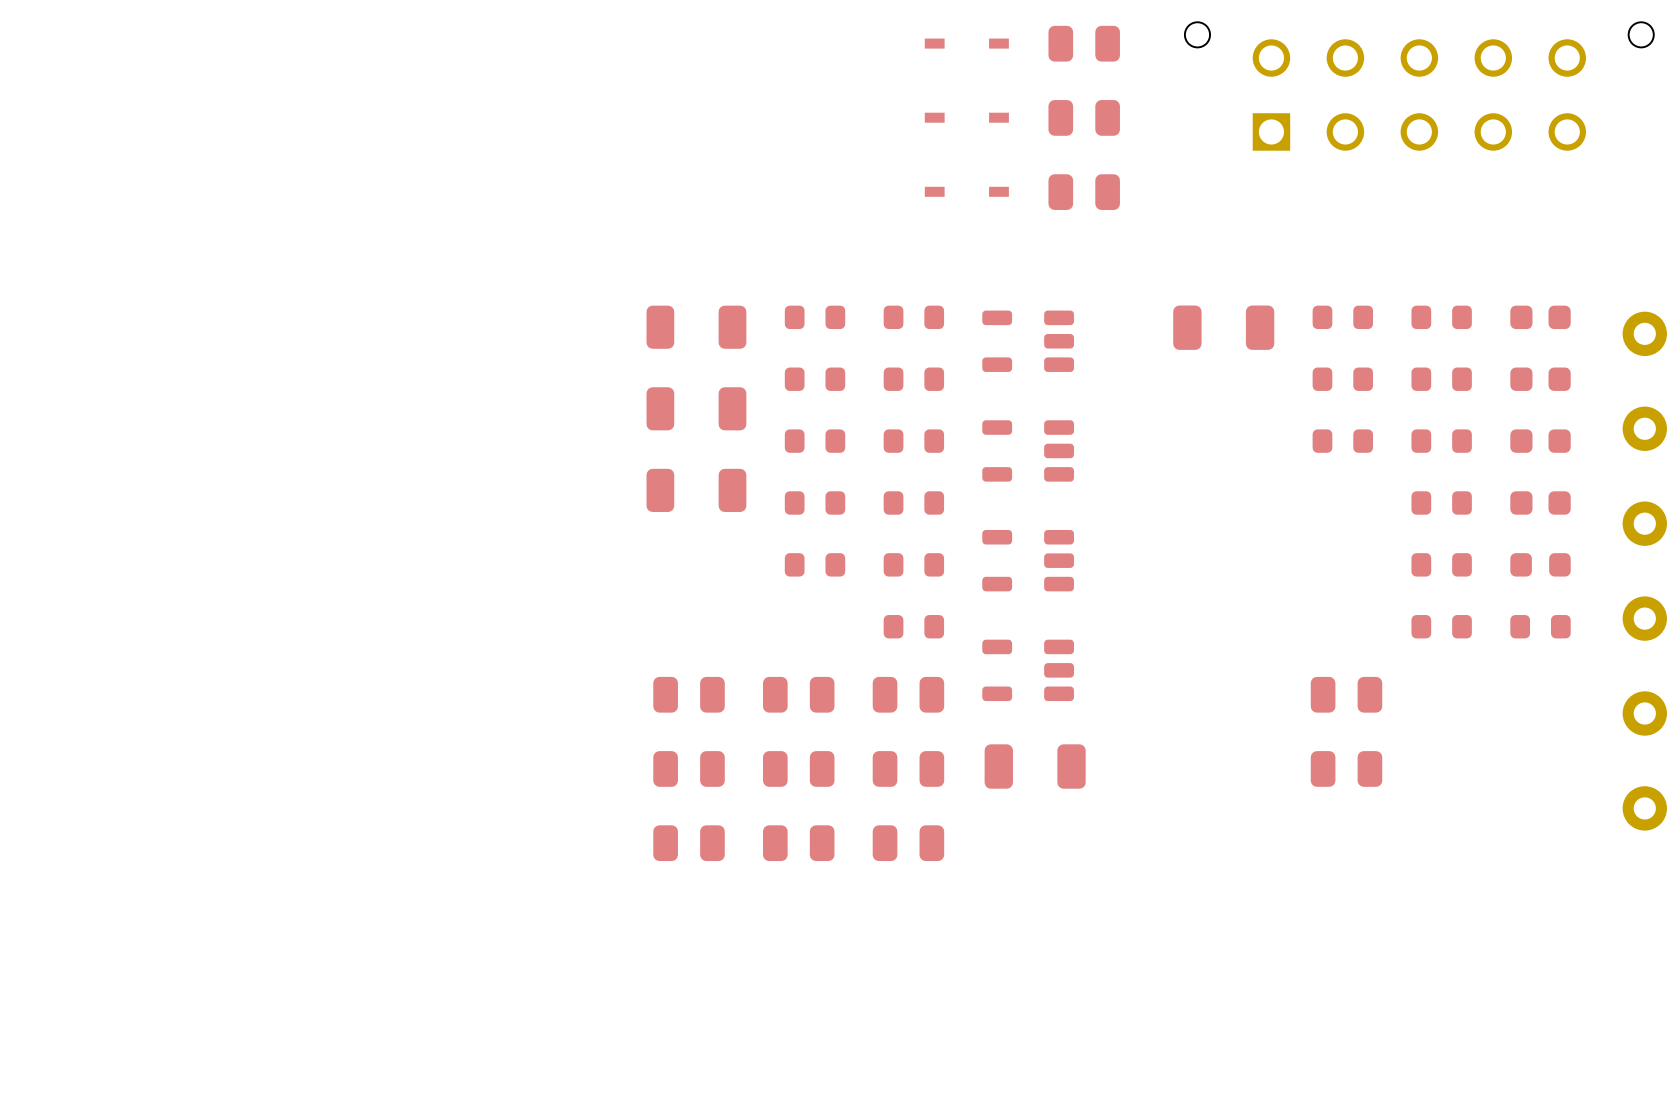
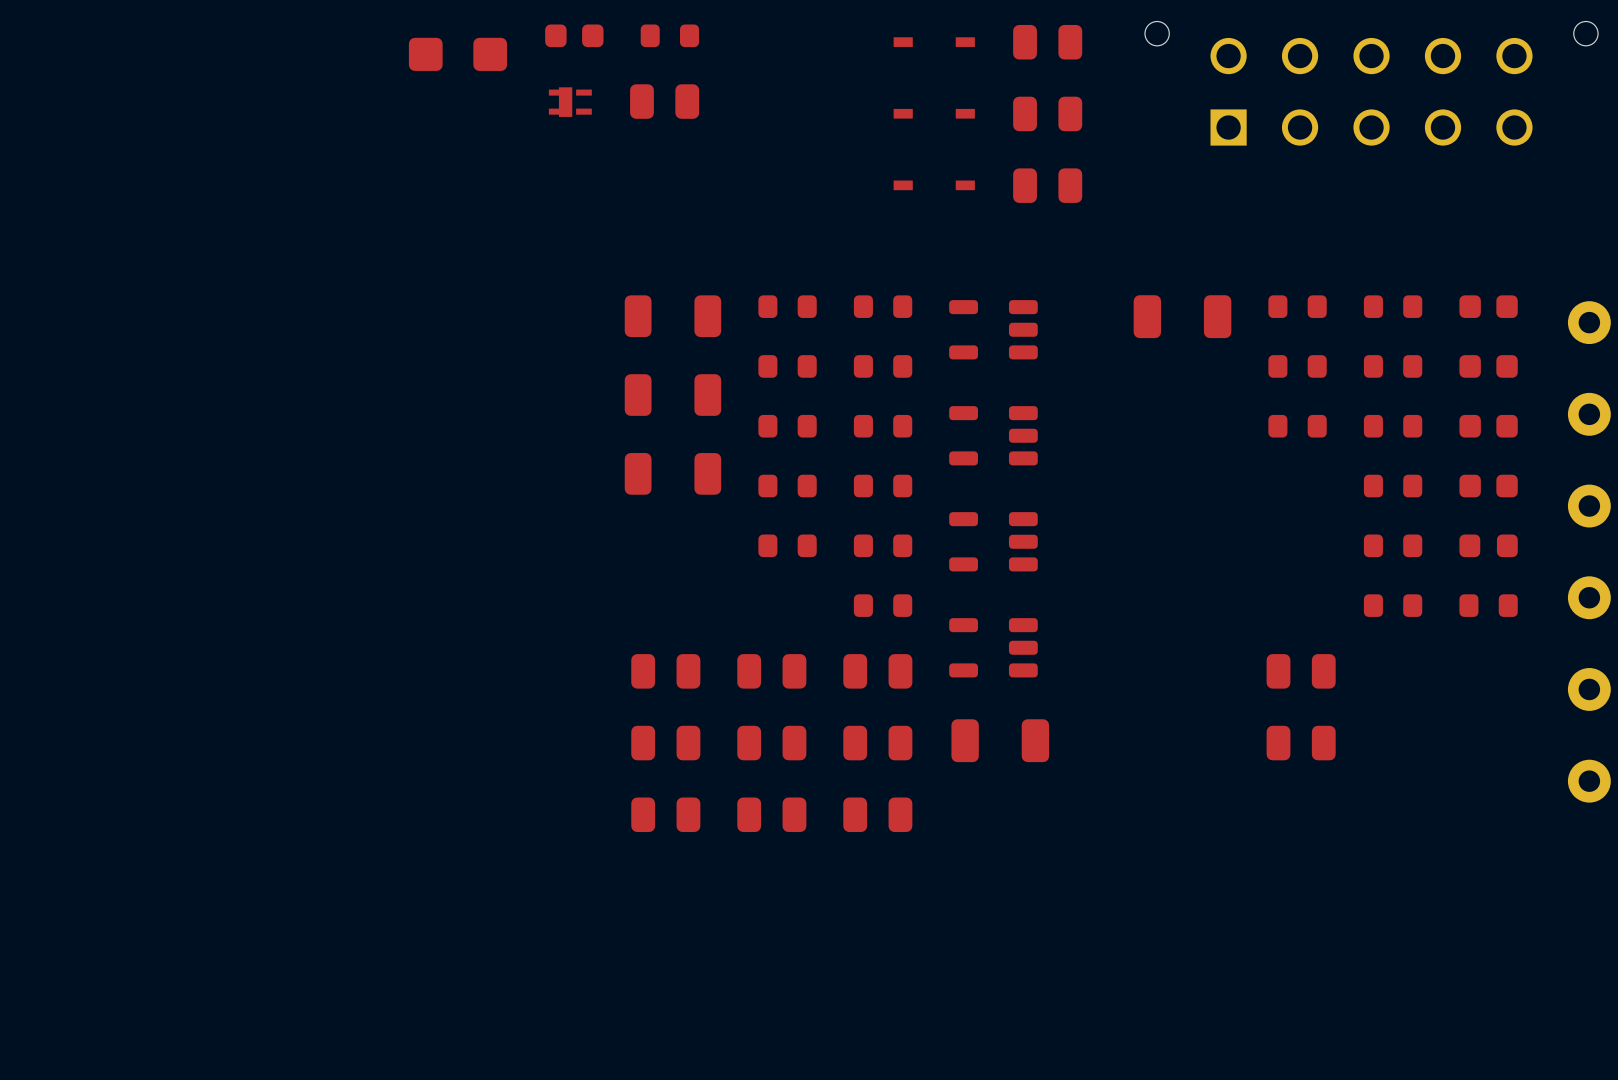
part: none -> (574, 35)
part: none -> (669, 35)
part: none -> (457, 54)
part: none -> (570, 102)
part: none -> (664, 101)

